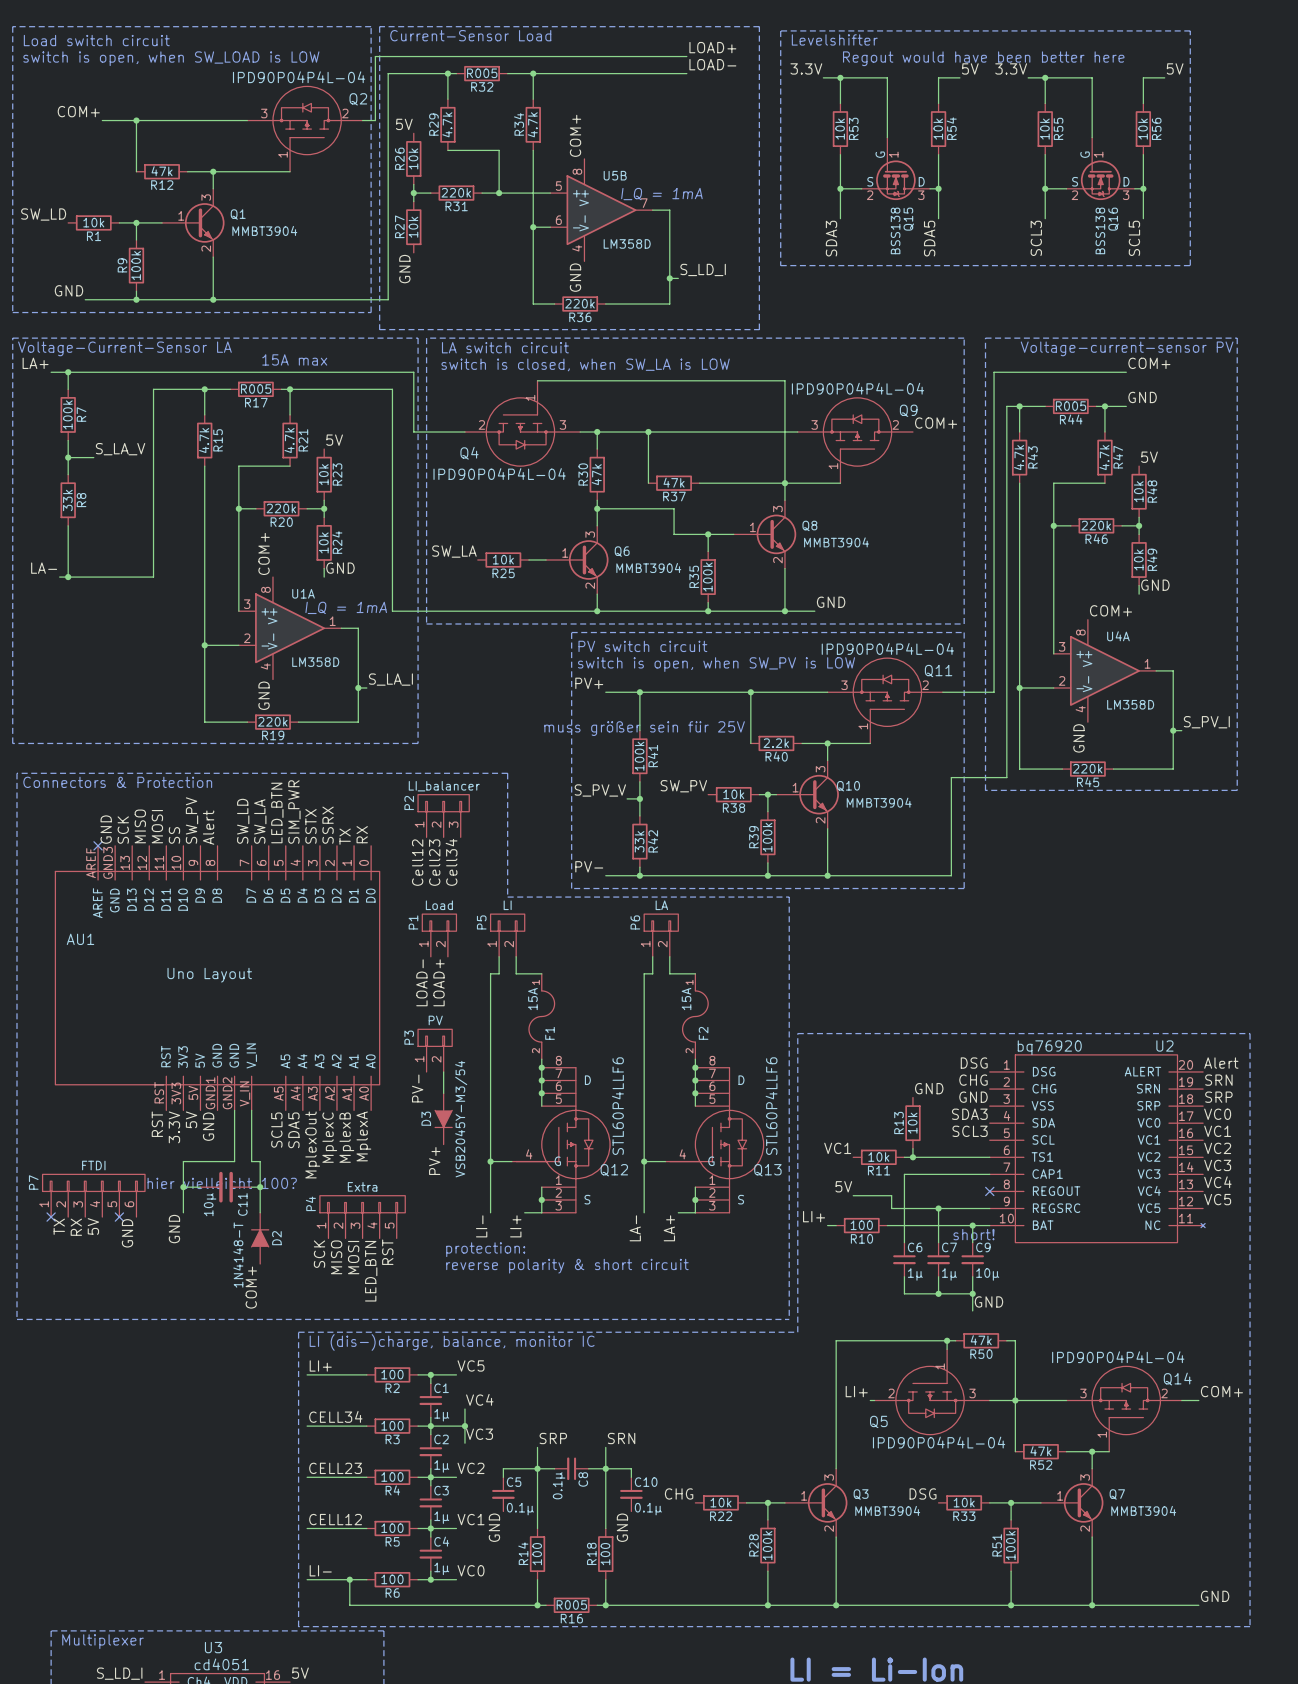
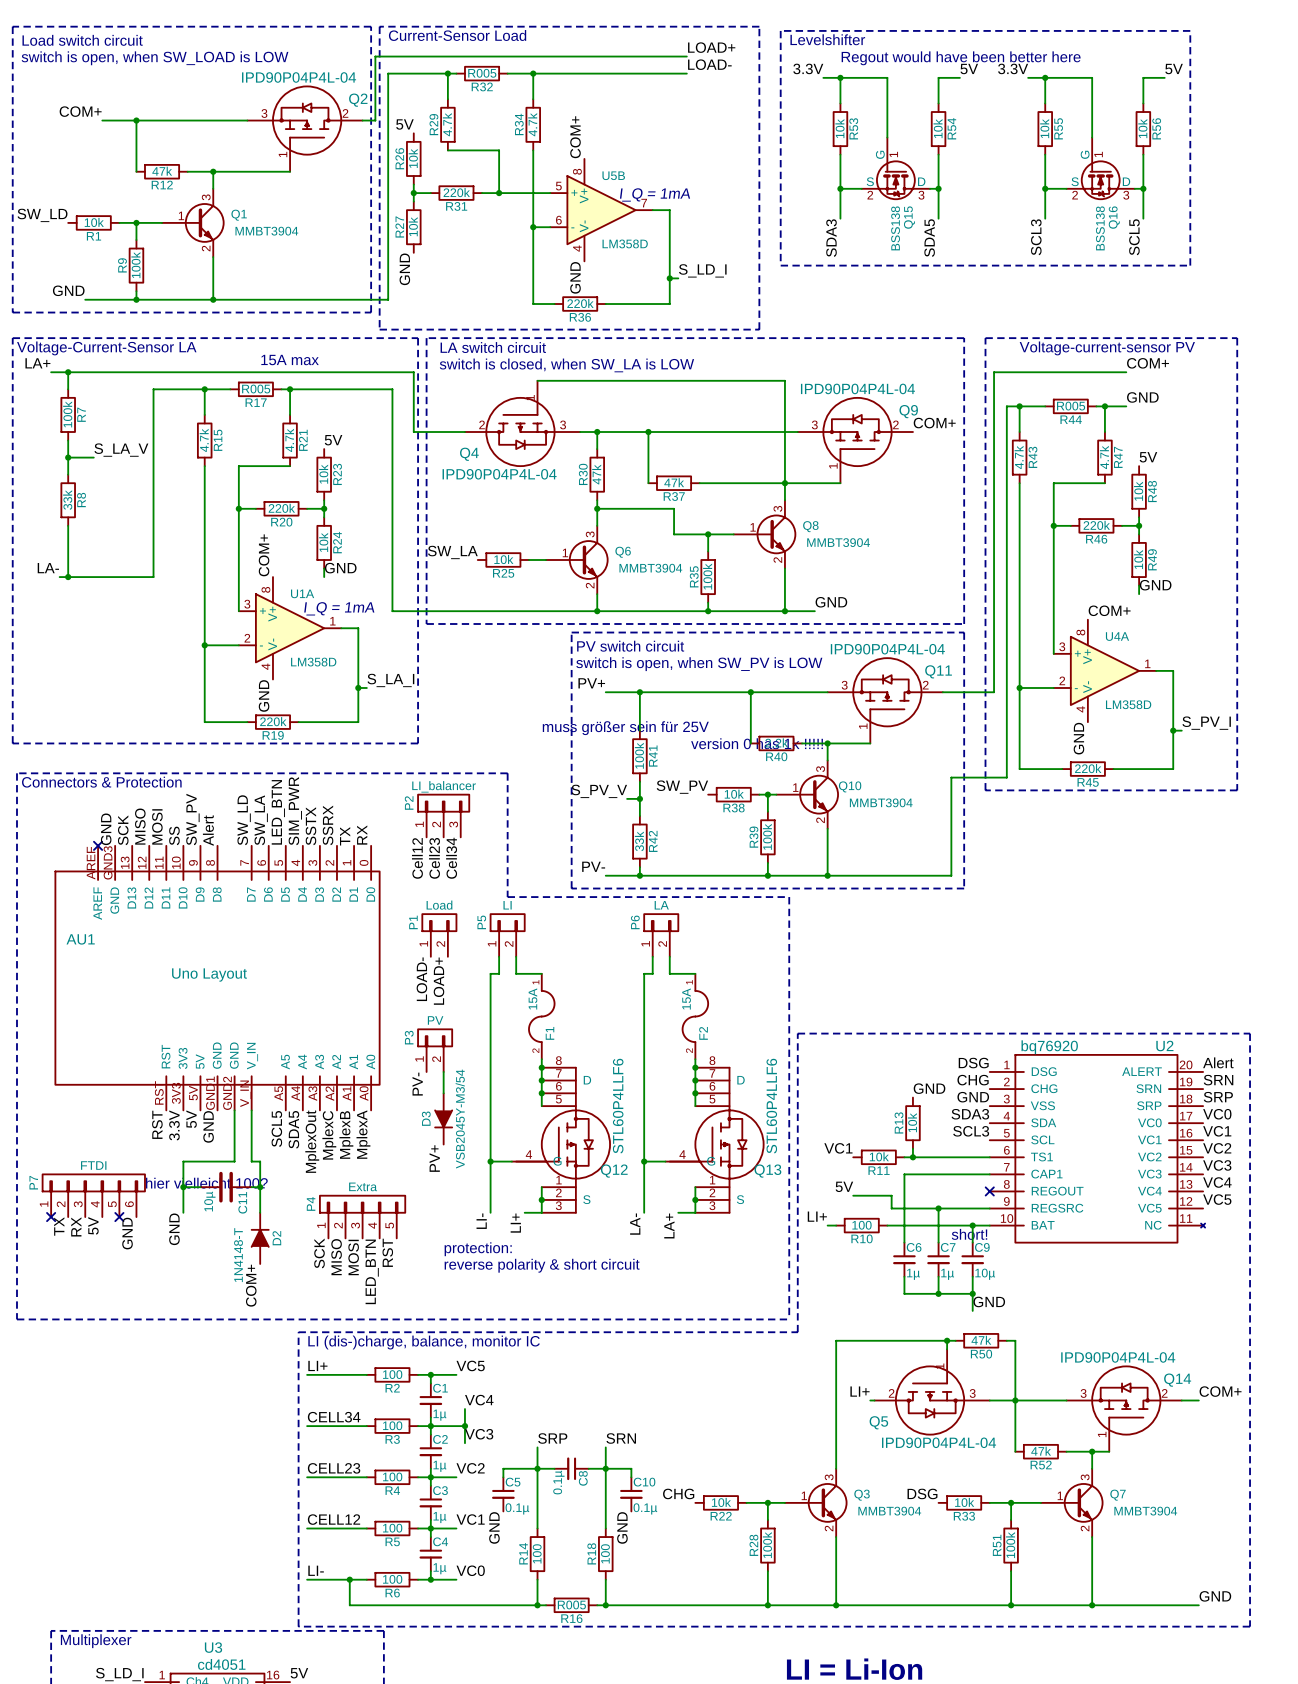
text: none -> version 0 has 1k !!!!! (757, 743)

